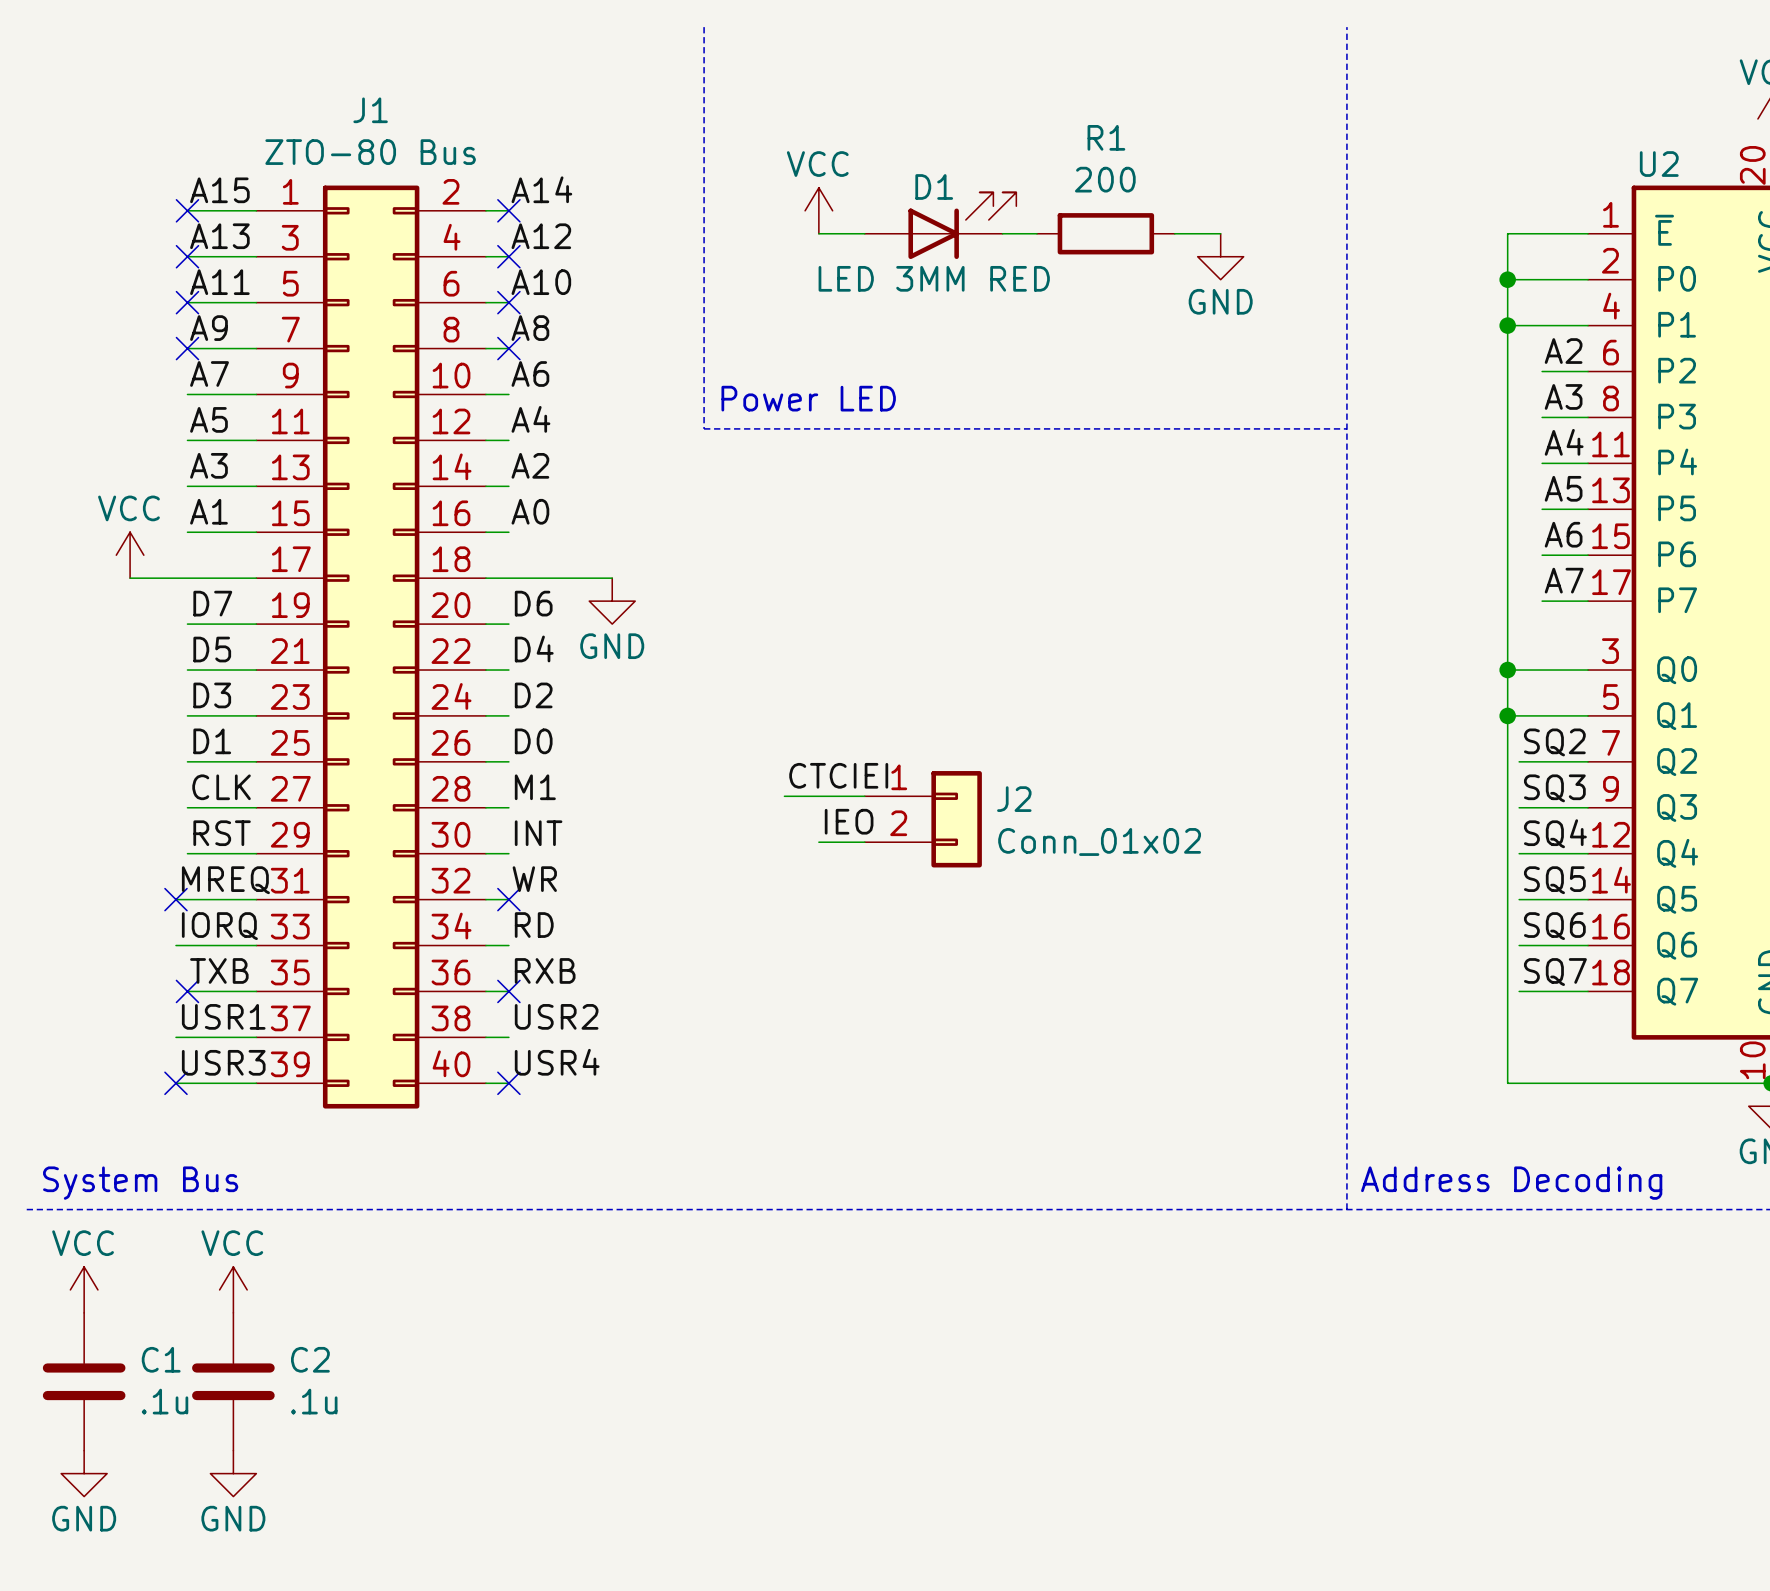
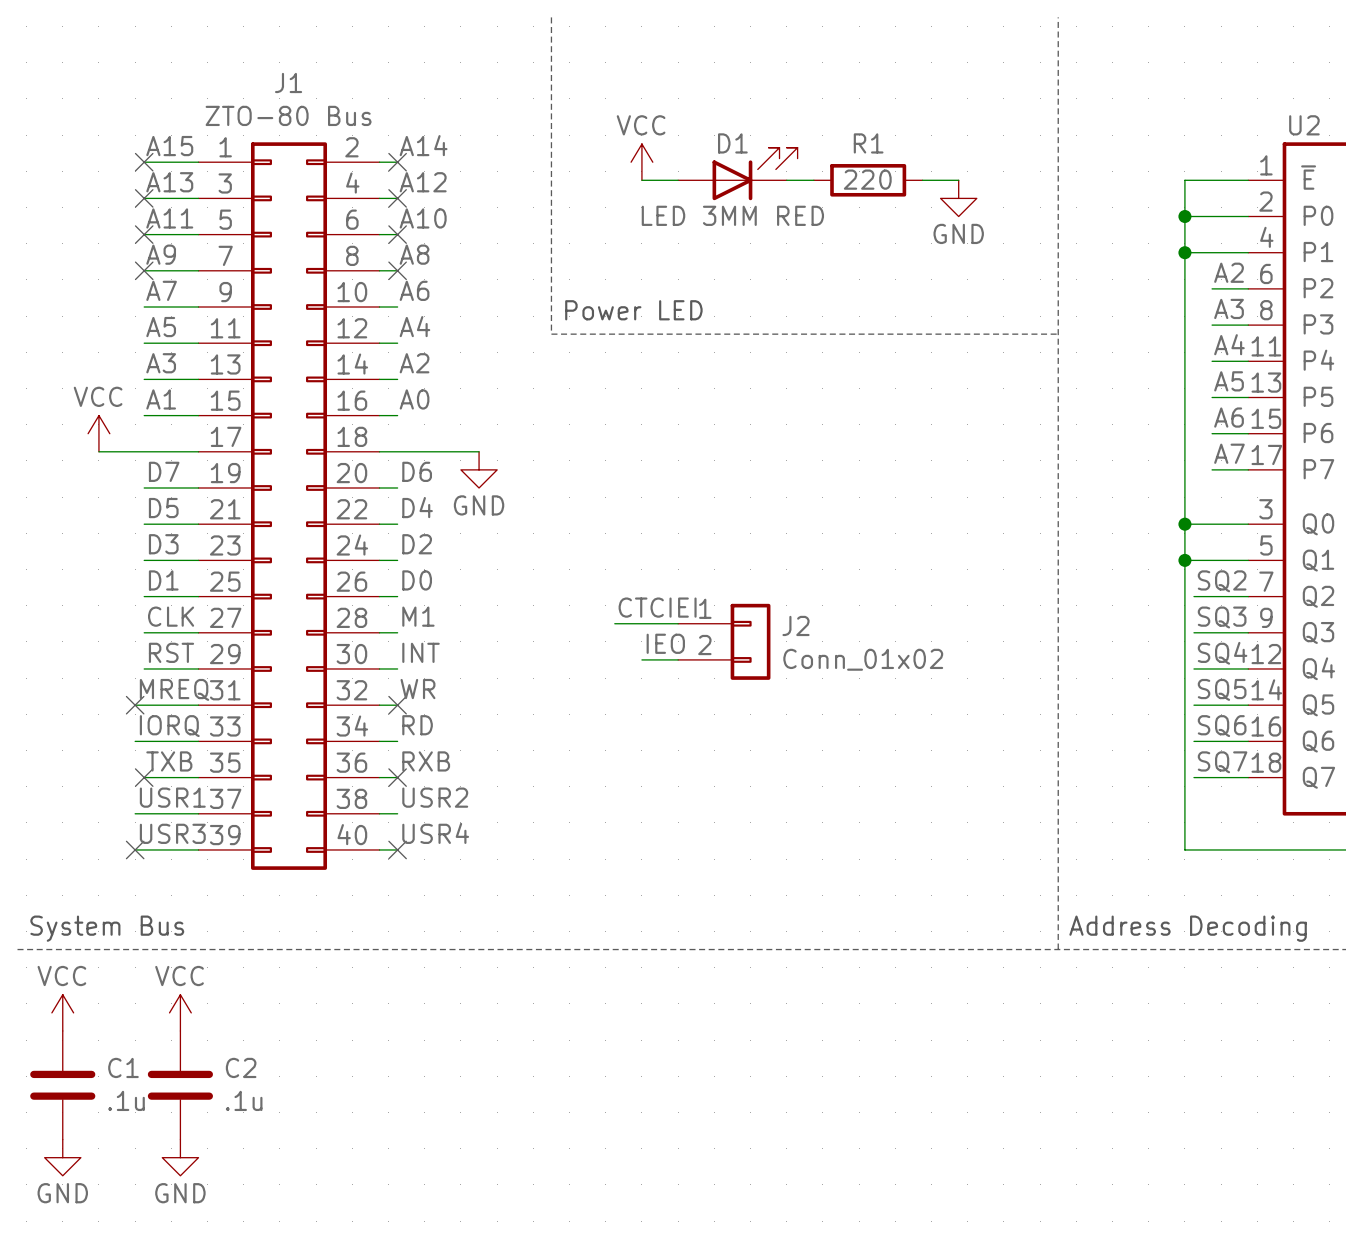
R1 name position: R1 (1106, 137) -> R1 (868, 143)
R1 value: 200 (1105, 179) -> 220 (867, 179)

